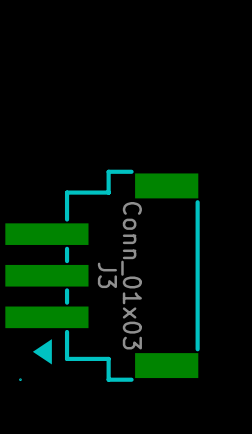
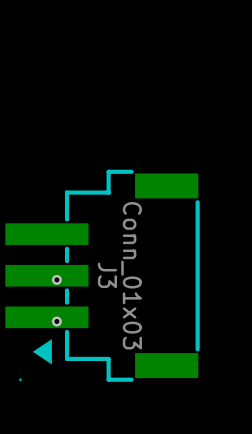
via: none -> (56, 279)
via: none -> (56, 321)

